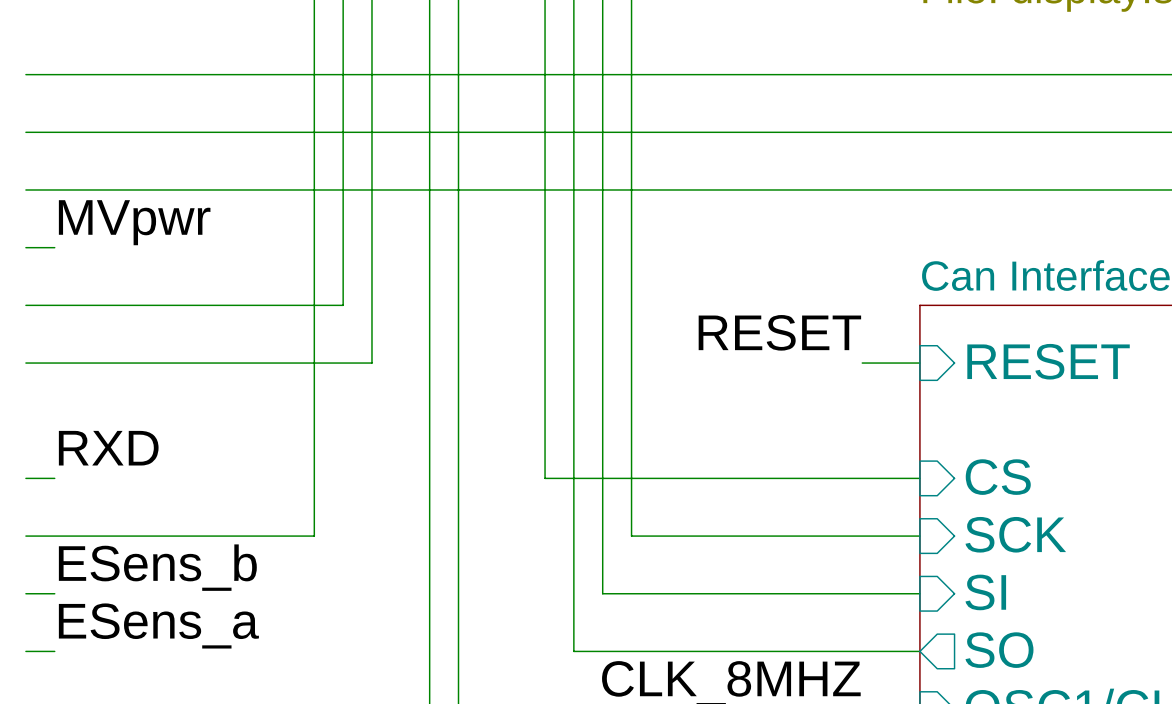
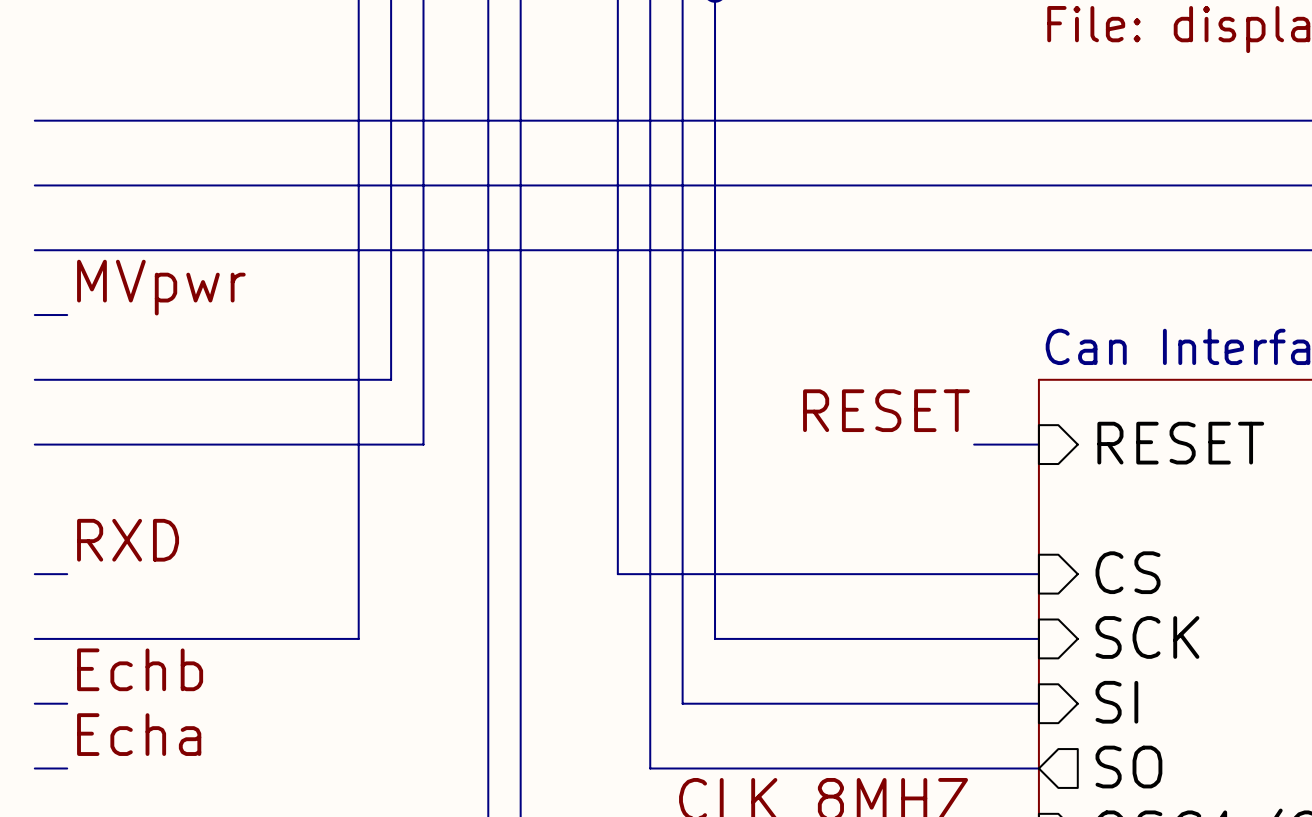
label: ESens_b (157, 567) -> Echb (140, 669)
label: ESens_a (158, 625) -> Echa (139, 734)

